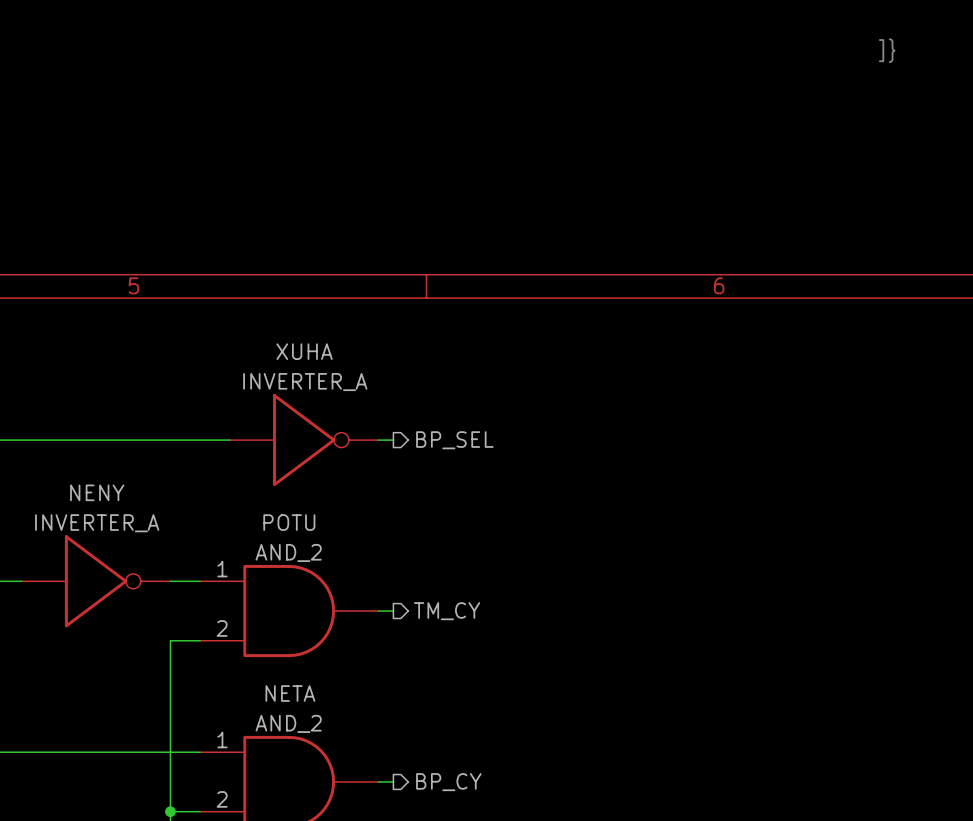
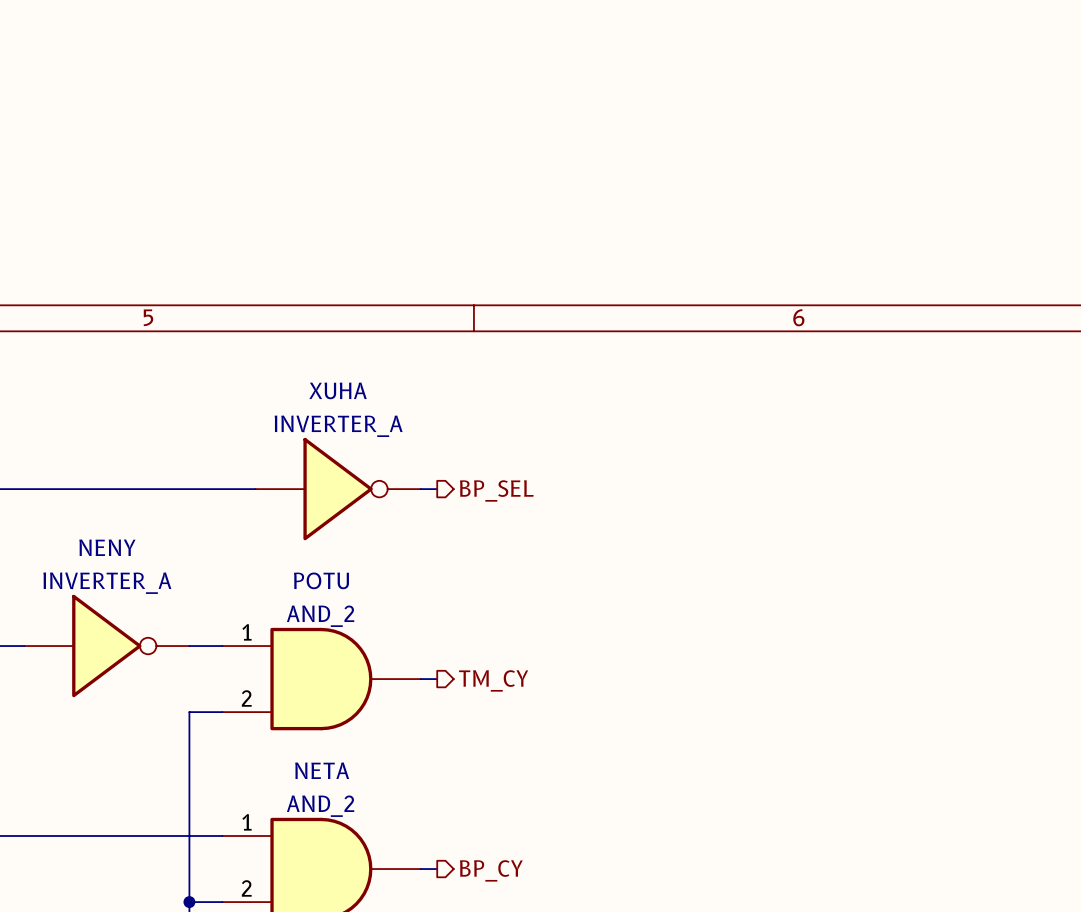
text: ]} (887, 50) -> none

